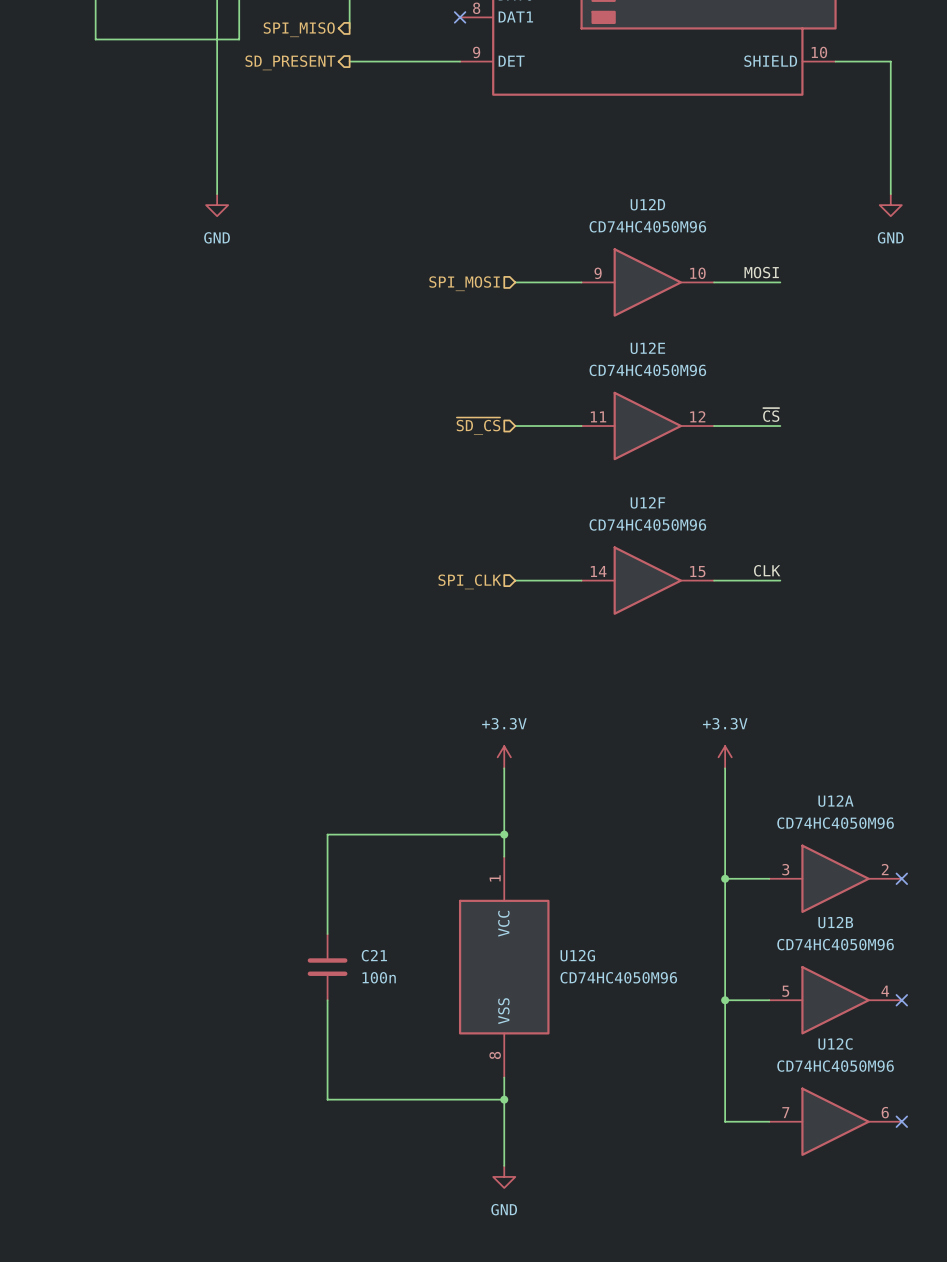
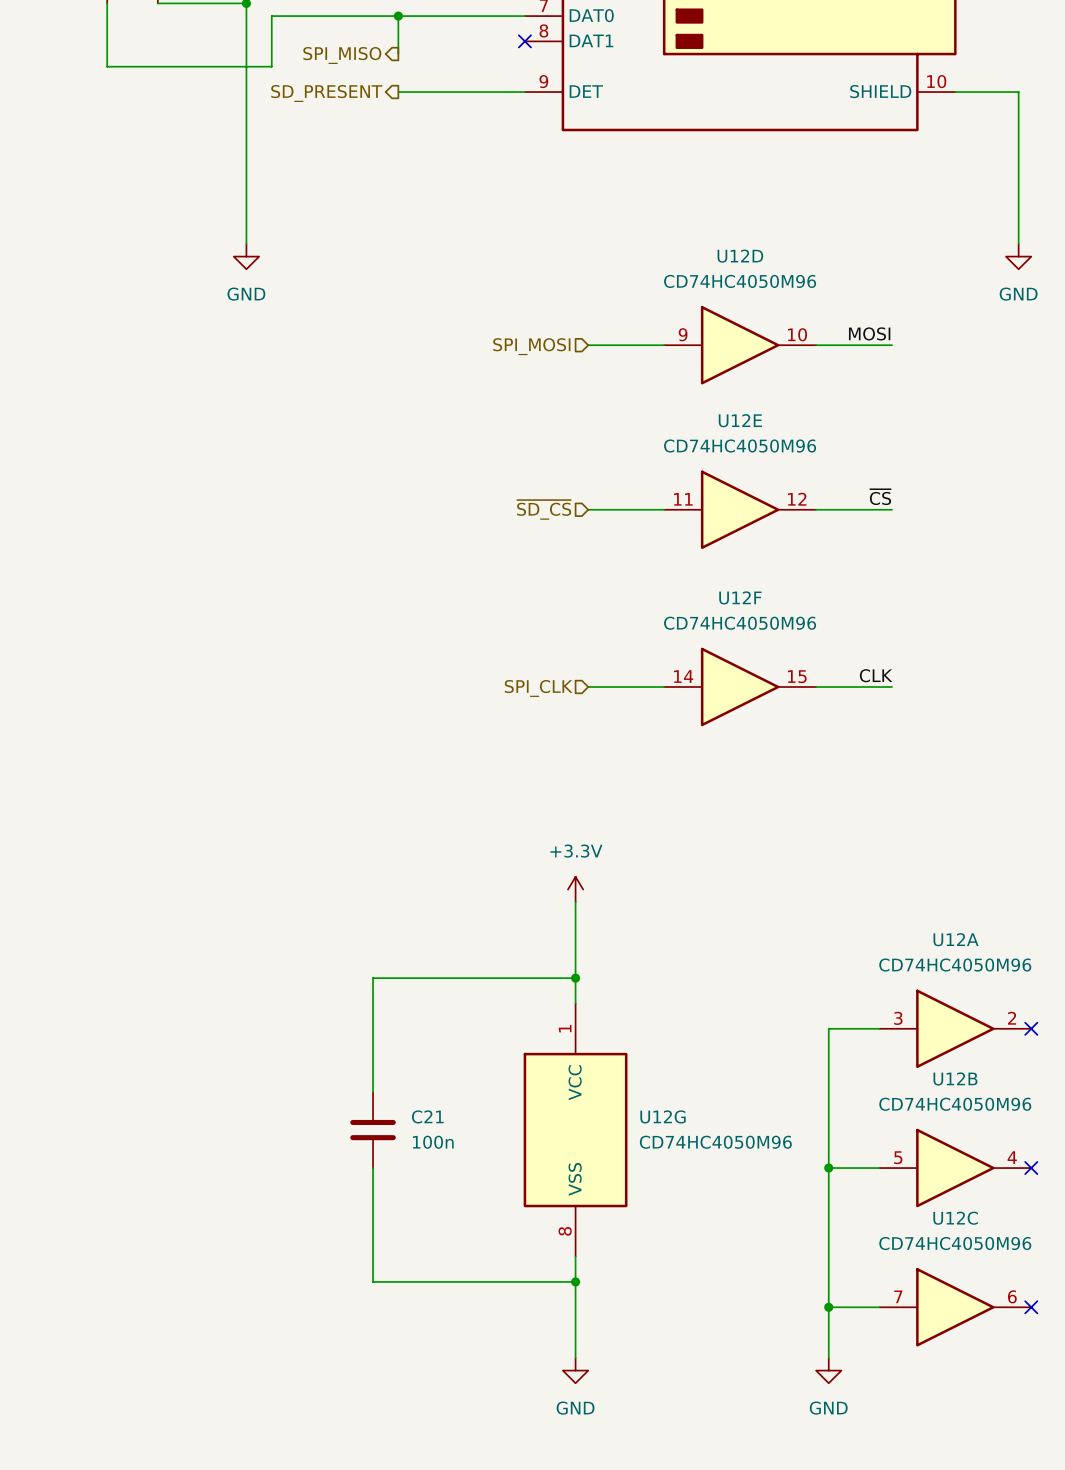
power symbol: +3.3V (725, 757) -> none
wire: (725, 768) (725, 878) -> none
junction: (725, 878) -> none
wire: none -> (828, 1307) (828, 1357)
junction: none -> (828, 1307)
power symbol: none -> GND (828, 1370)

